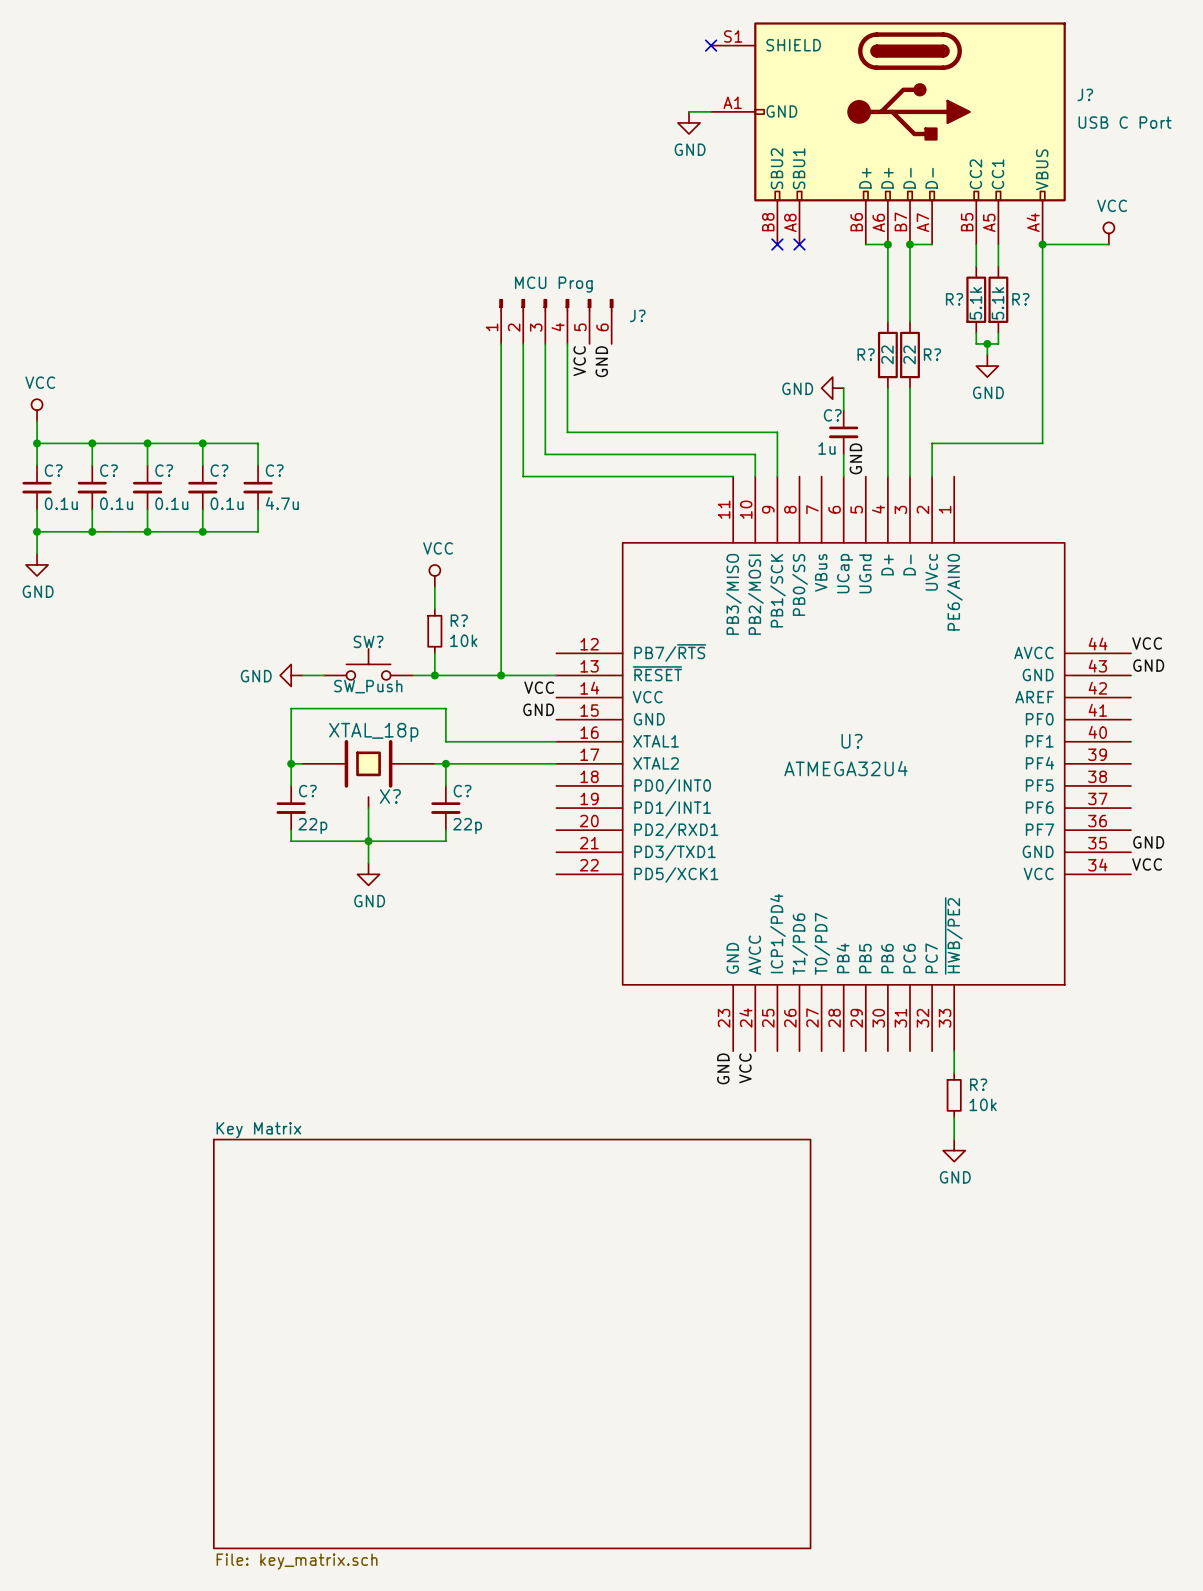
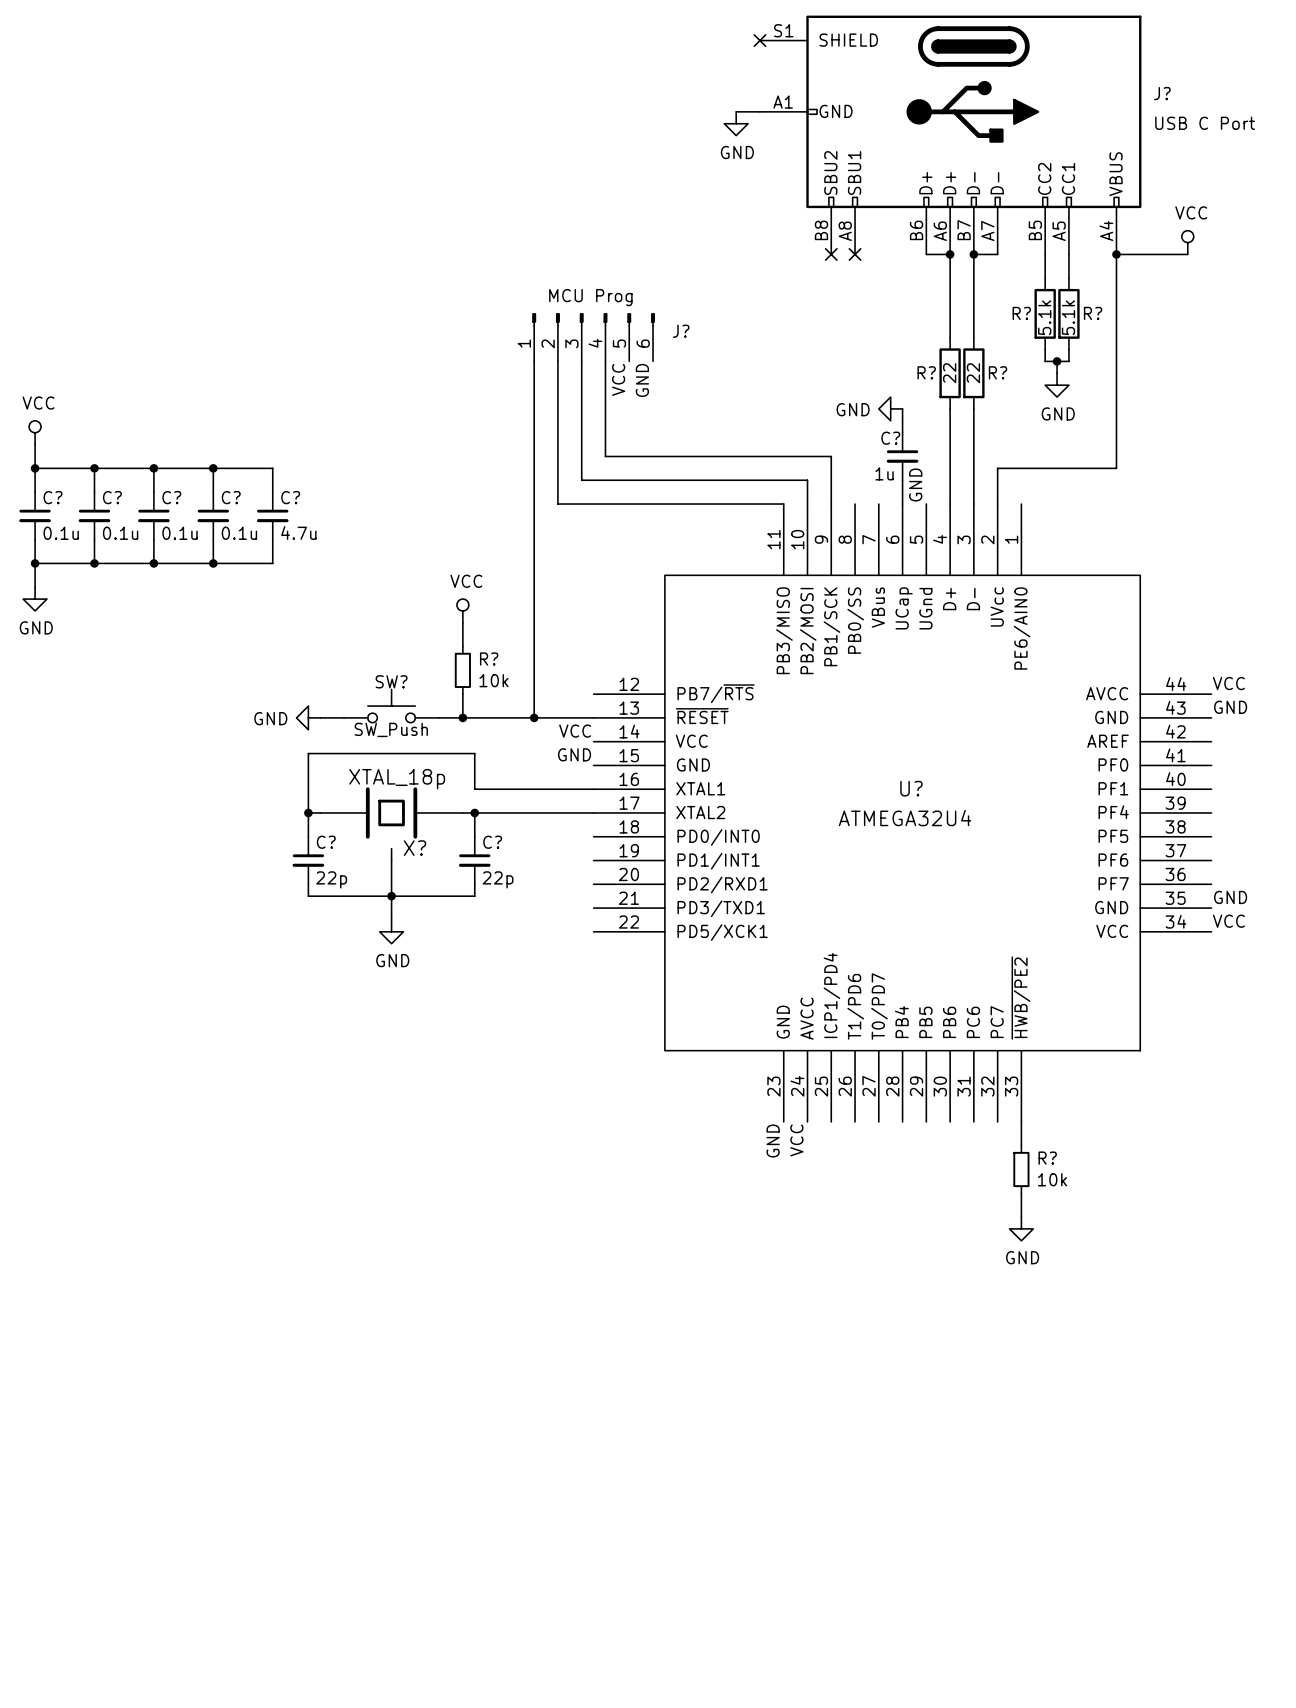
sheet Key Matrix: File: key_matrix.sch (512, 1343) -> none

